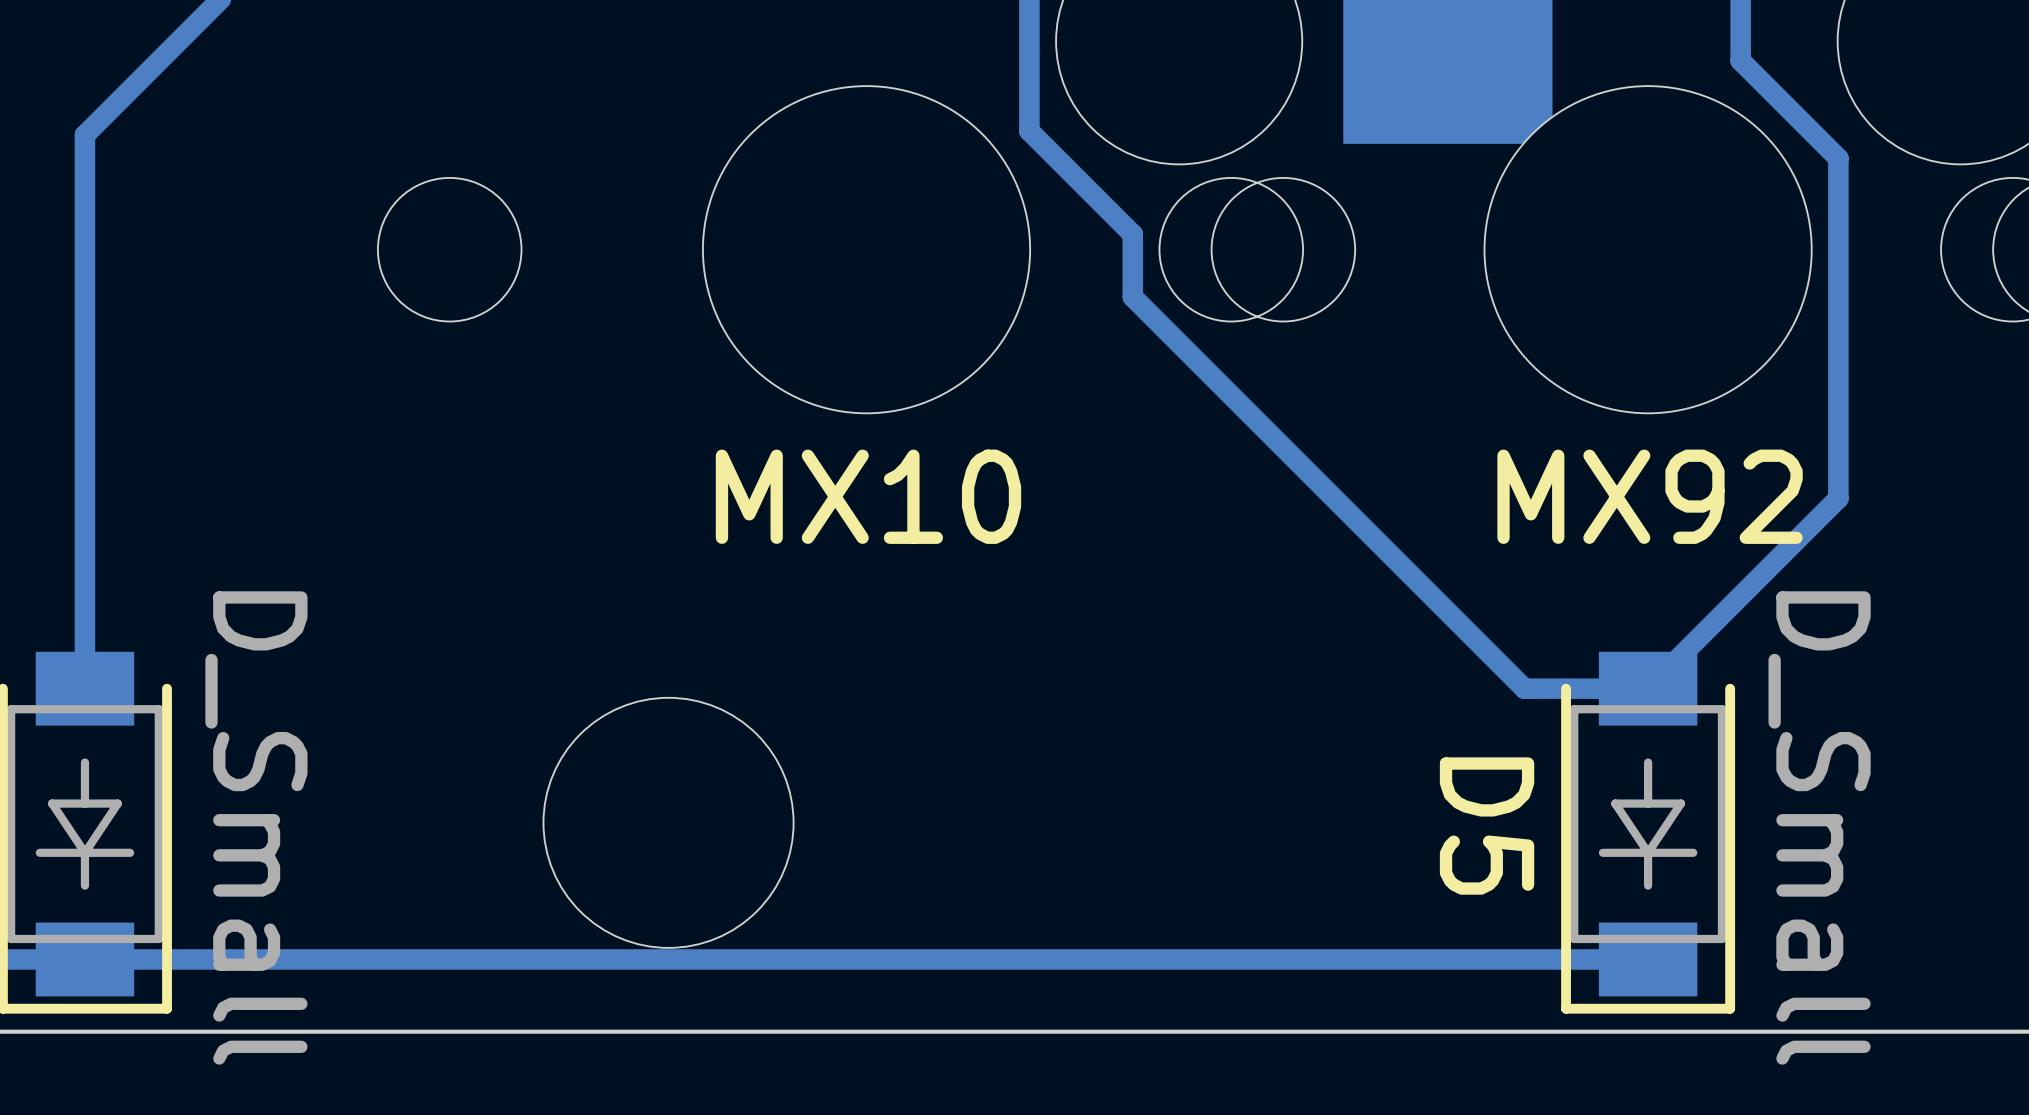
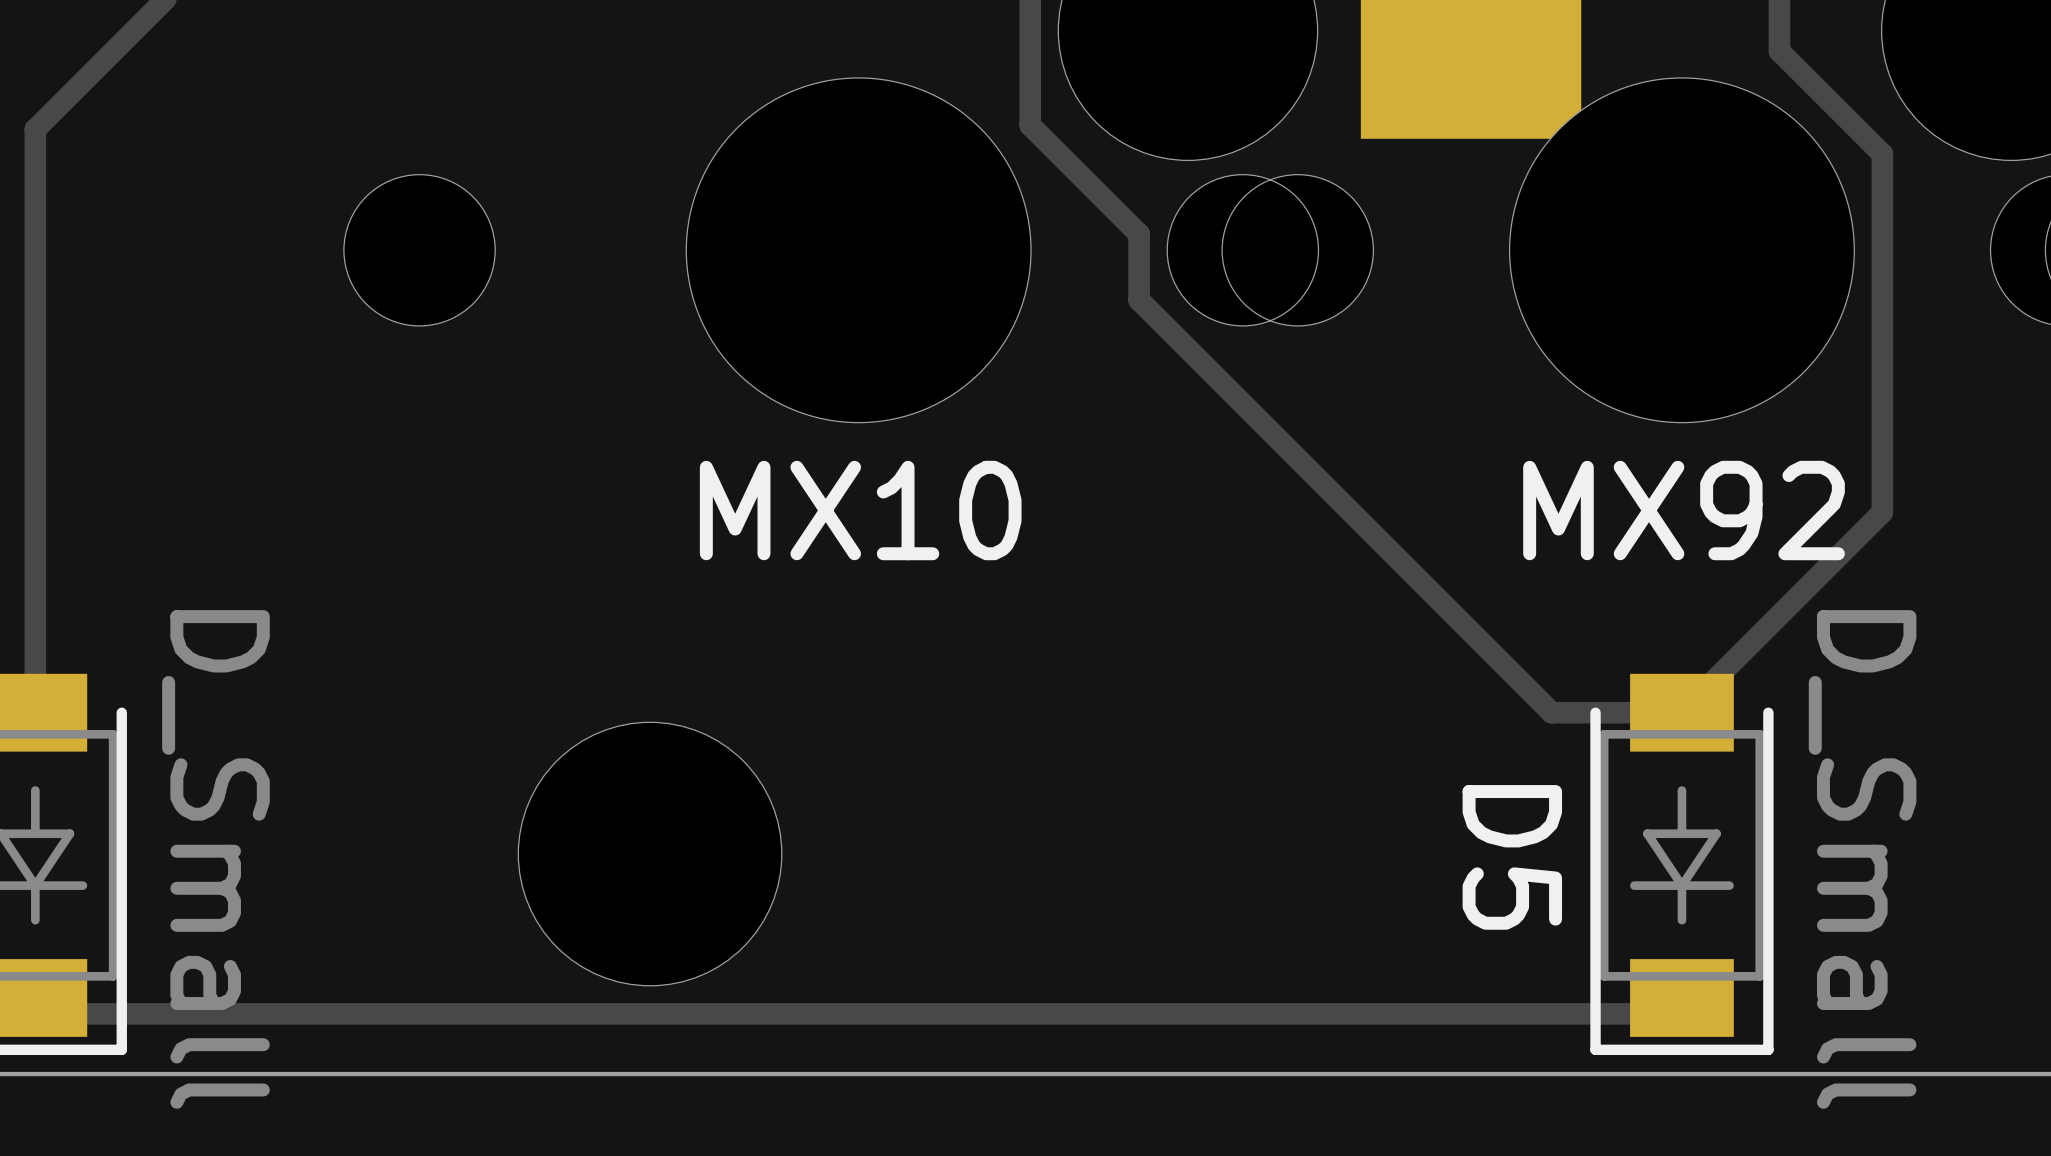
track: (1648, 959) (84, 959) -> (1681, 997) (1666, 1013) (51, 1013) (35, 997)

